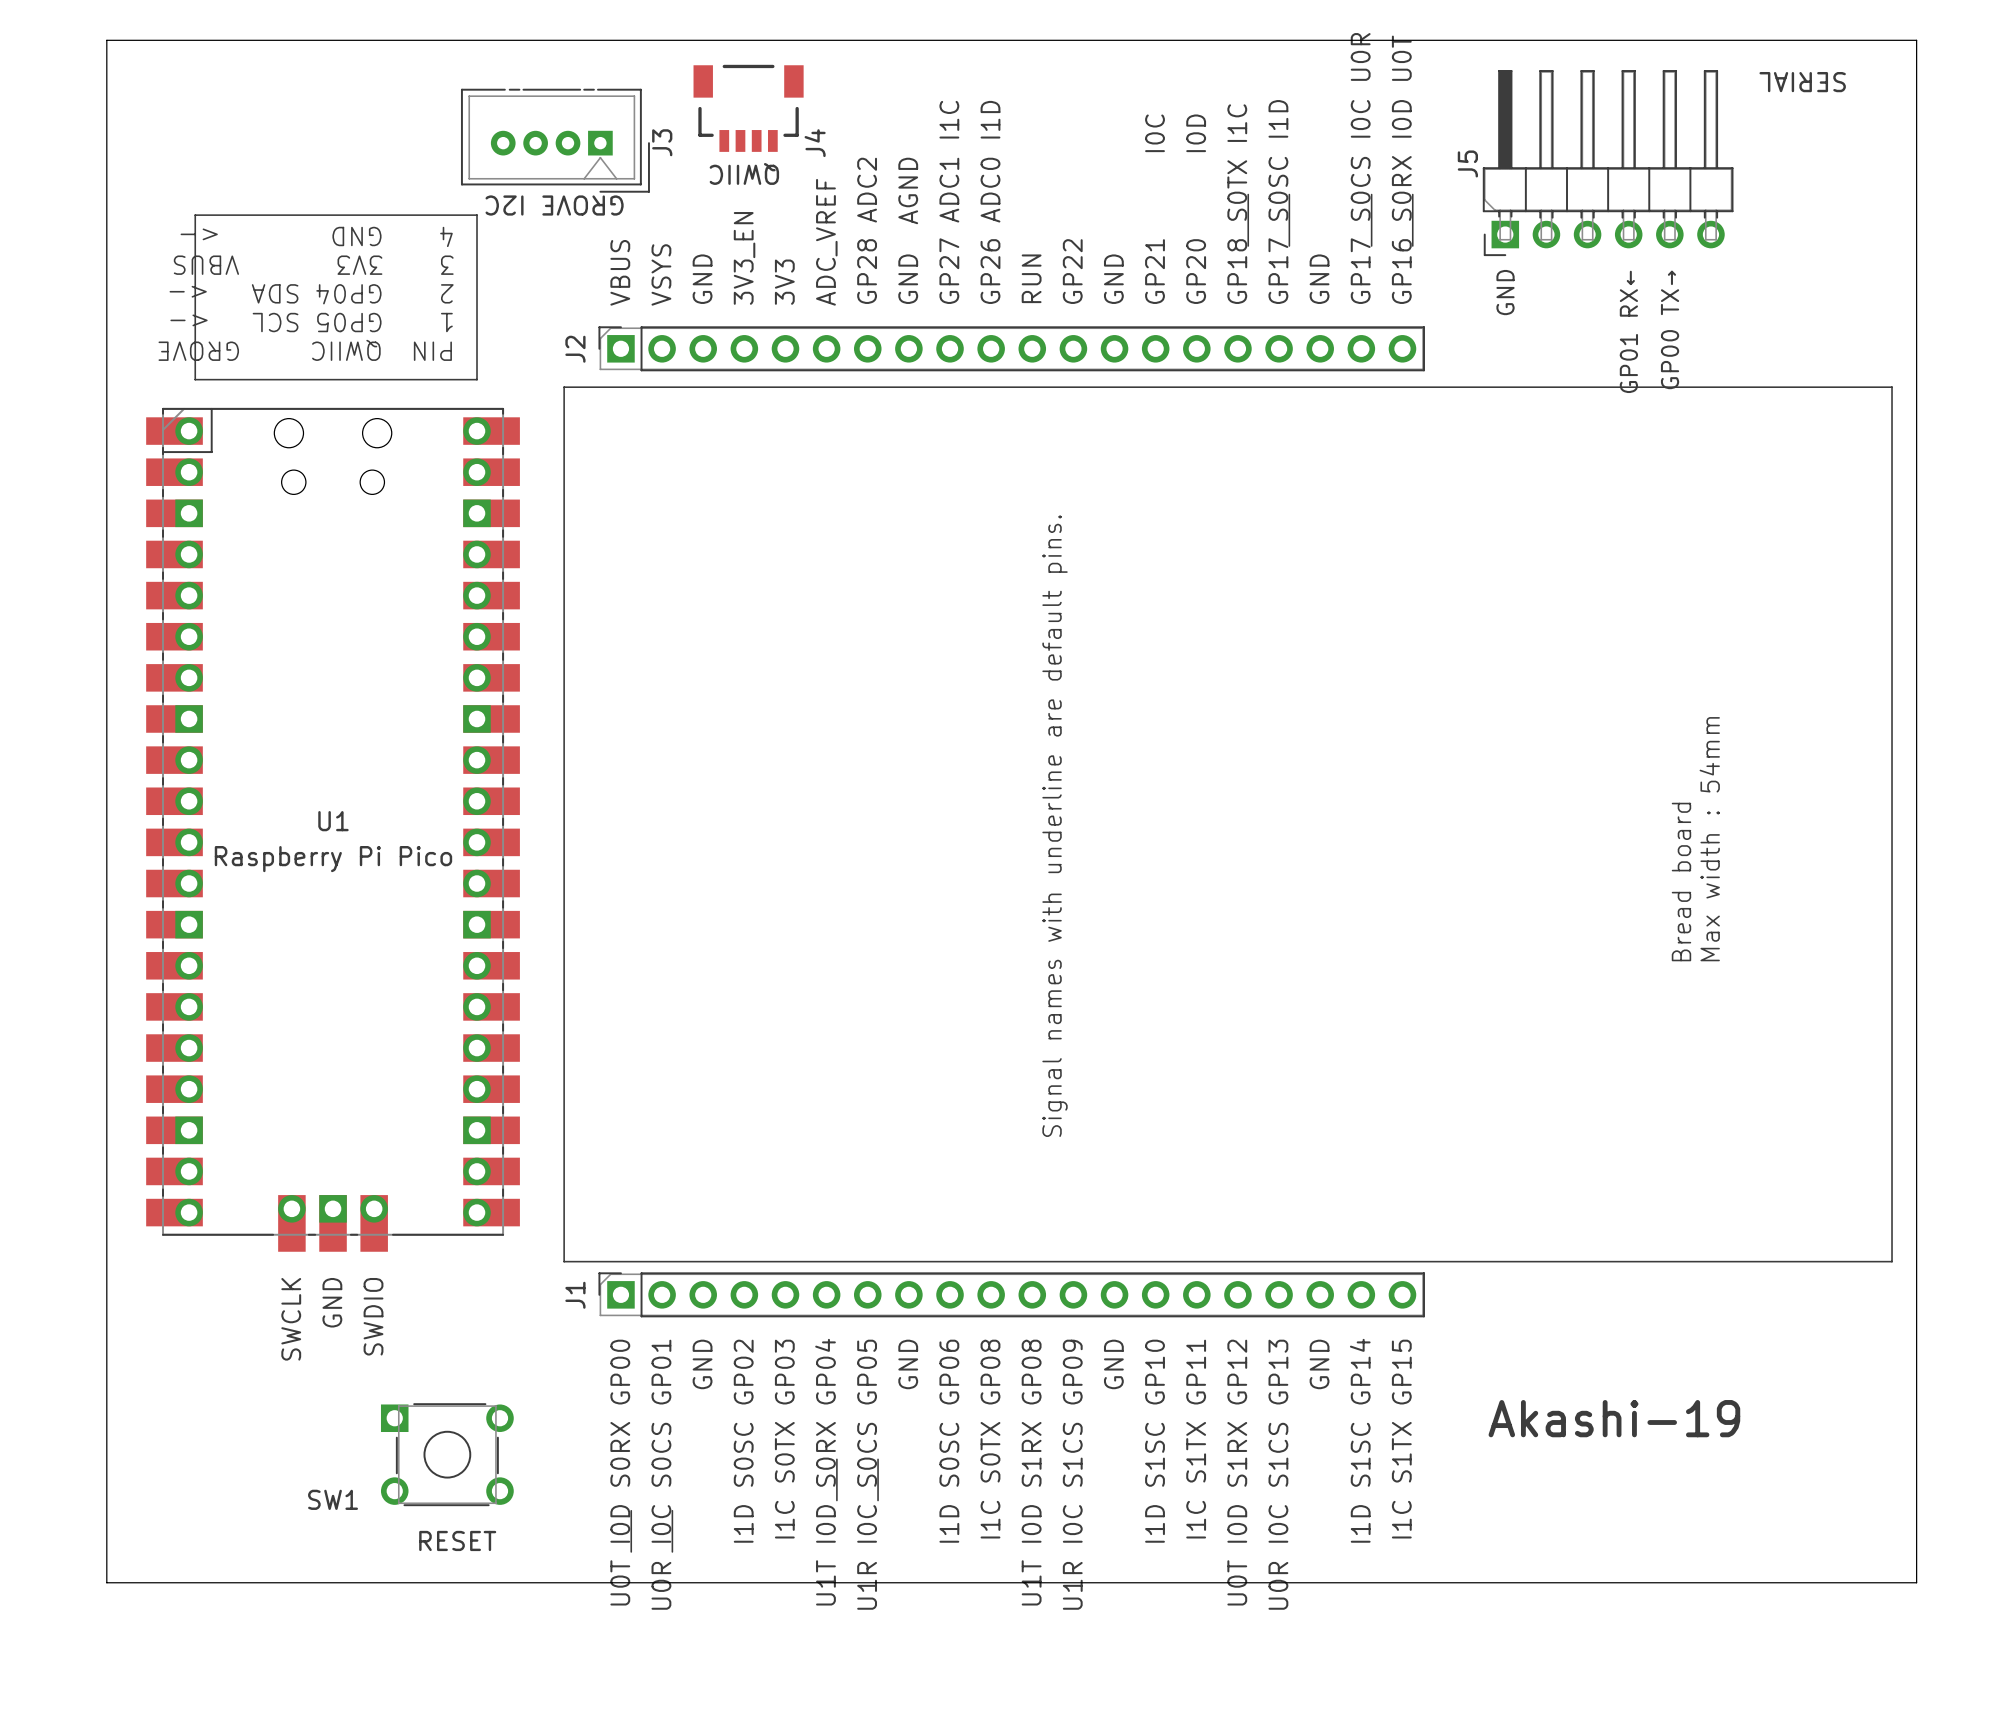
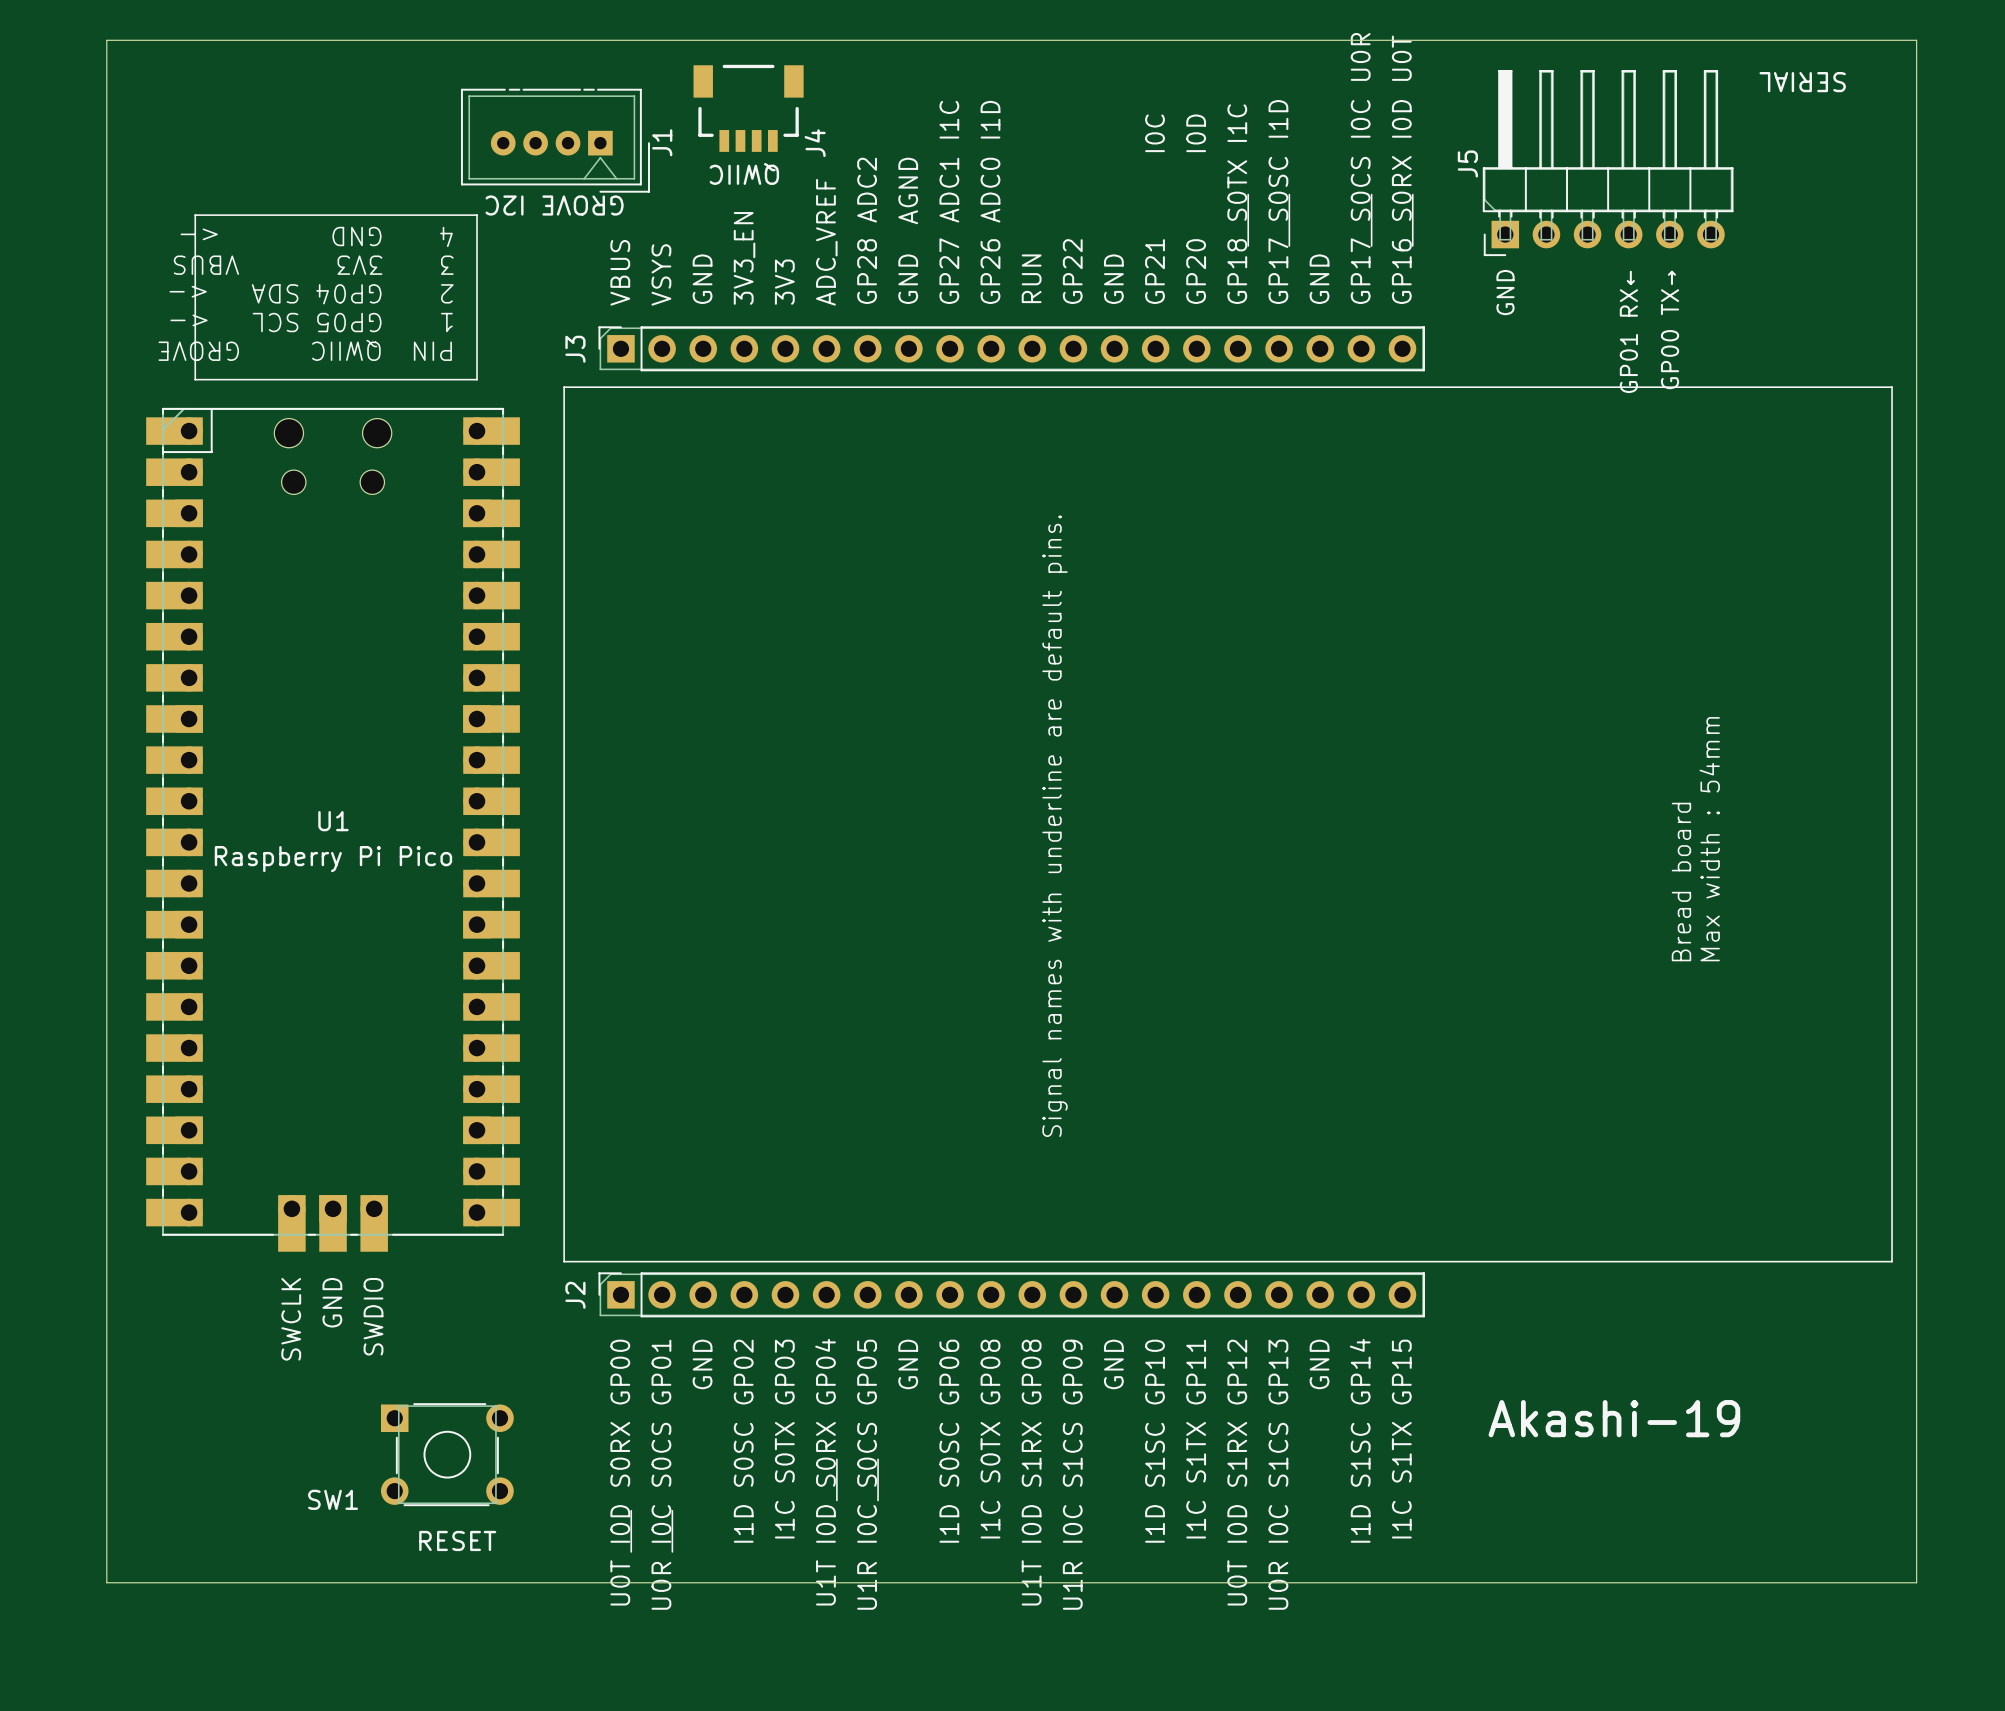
J3 name: J3 (662, 142) -> J1 (662, 142)
J2 name: J2 (575, 349) -> J3 (575, 349)
J1 name: J1 (575, 1295) -> J2 (575, 1295)

